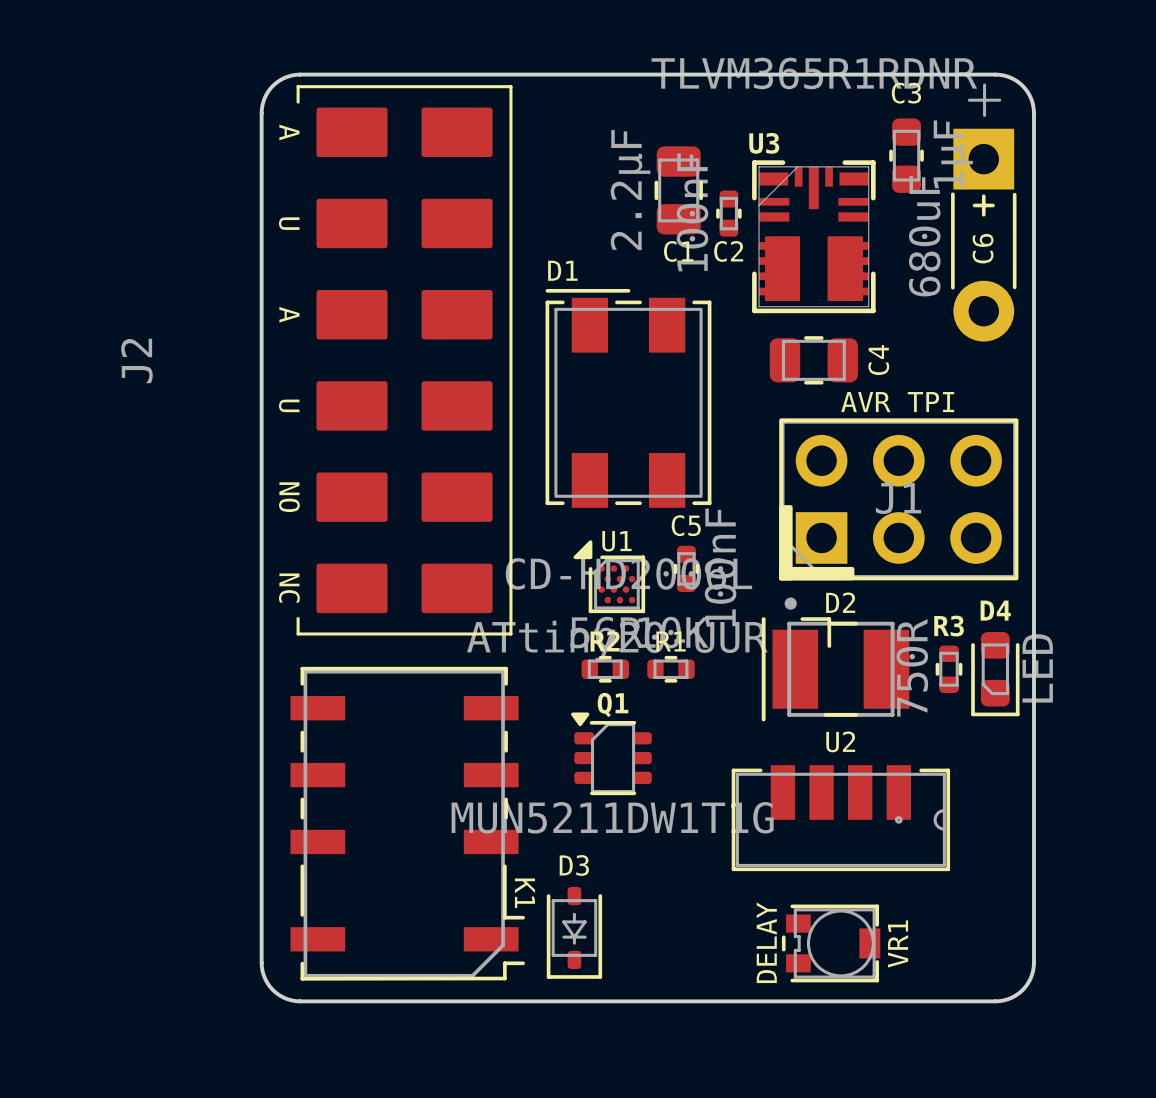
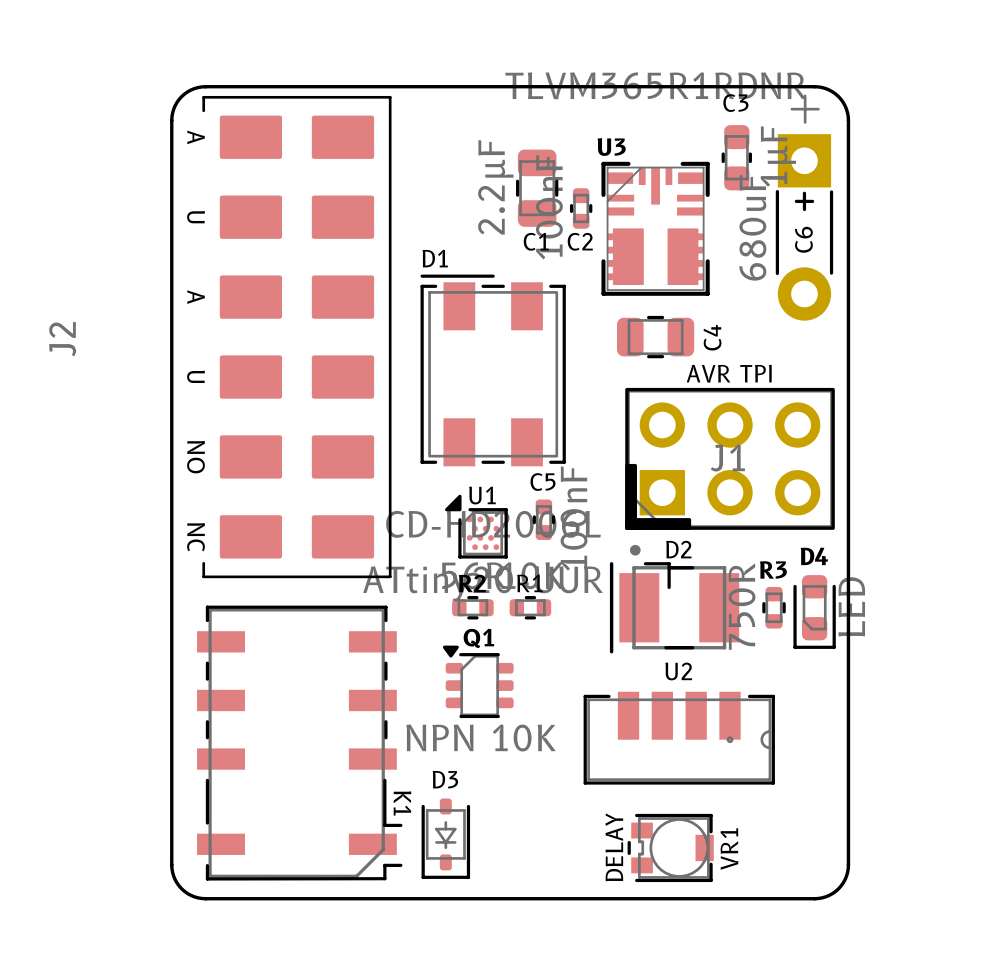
Q1 value: MUN5211DW1T1G (612, 817) -> NPN 10K (481, 738)

